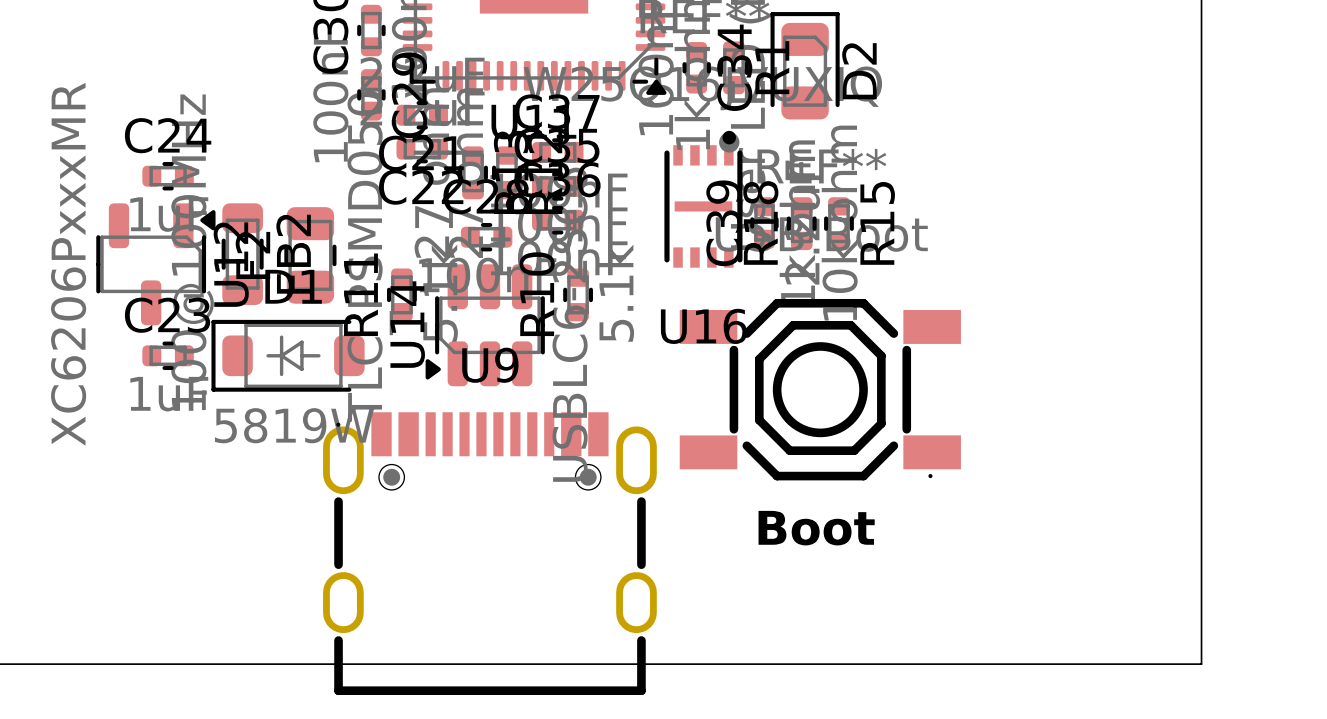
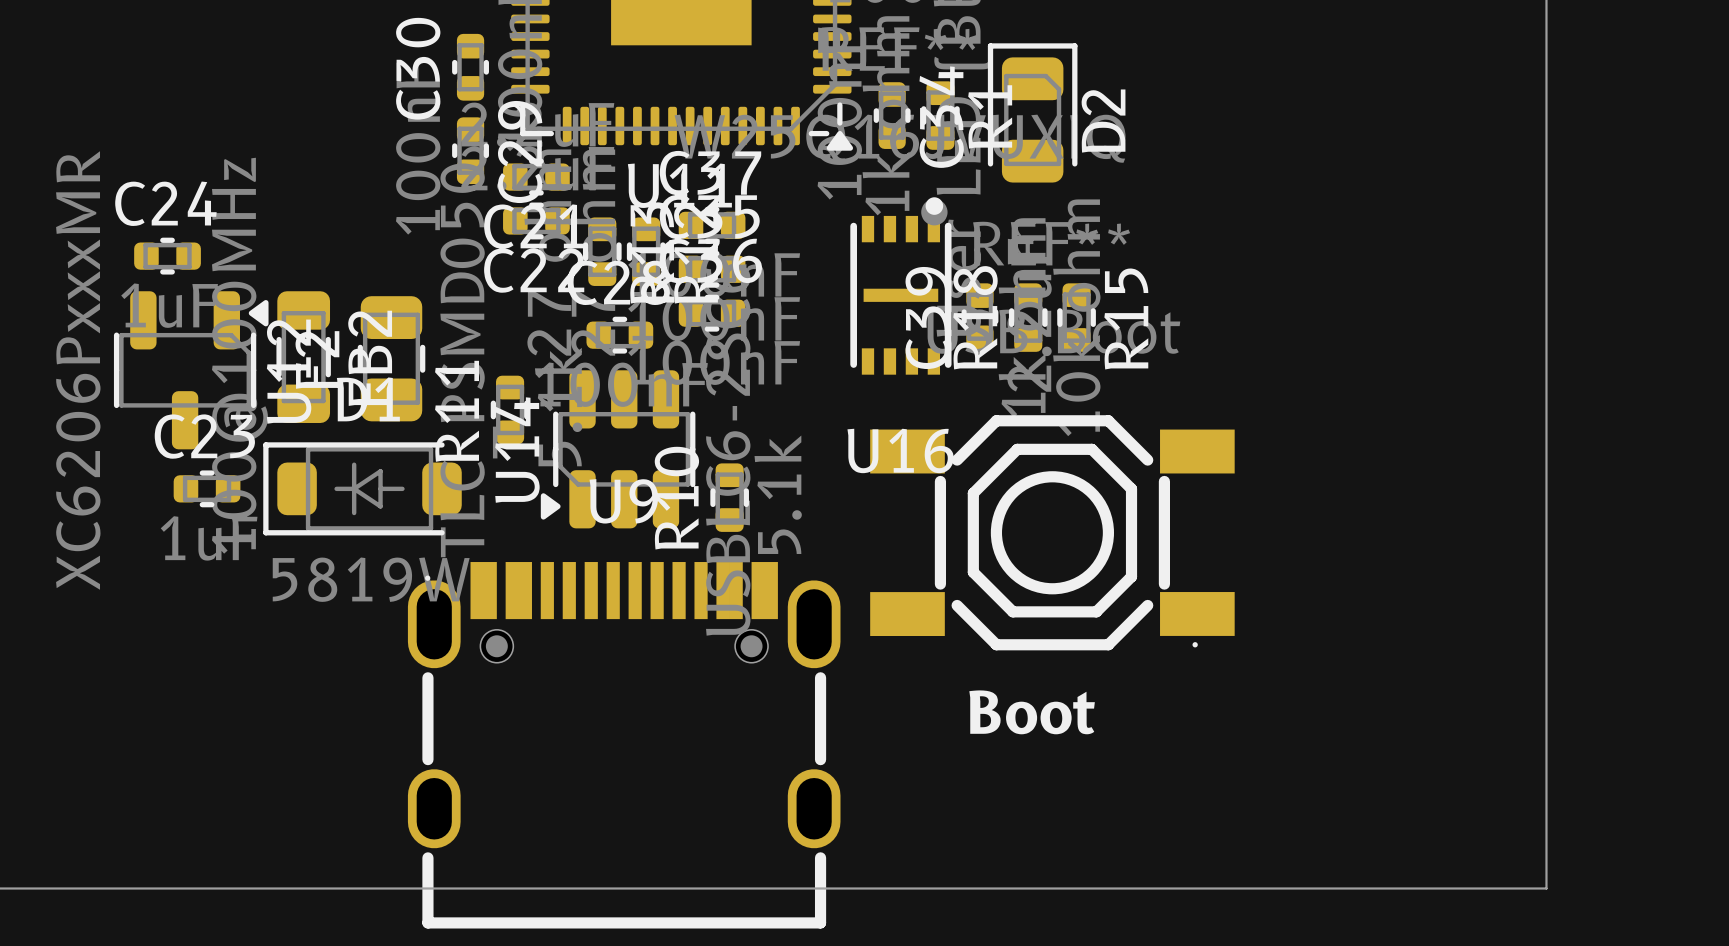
C24 position: (168, 176) -> (167, 256)
R10 position: (578, 294) -> (729, 497)

